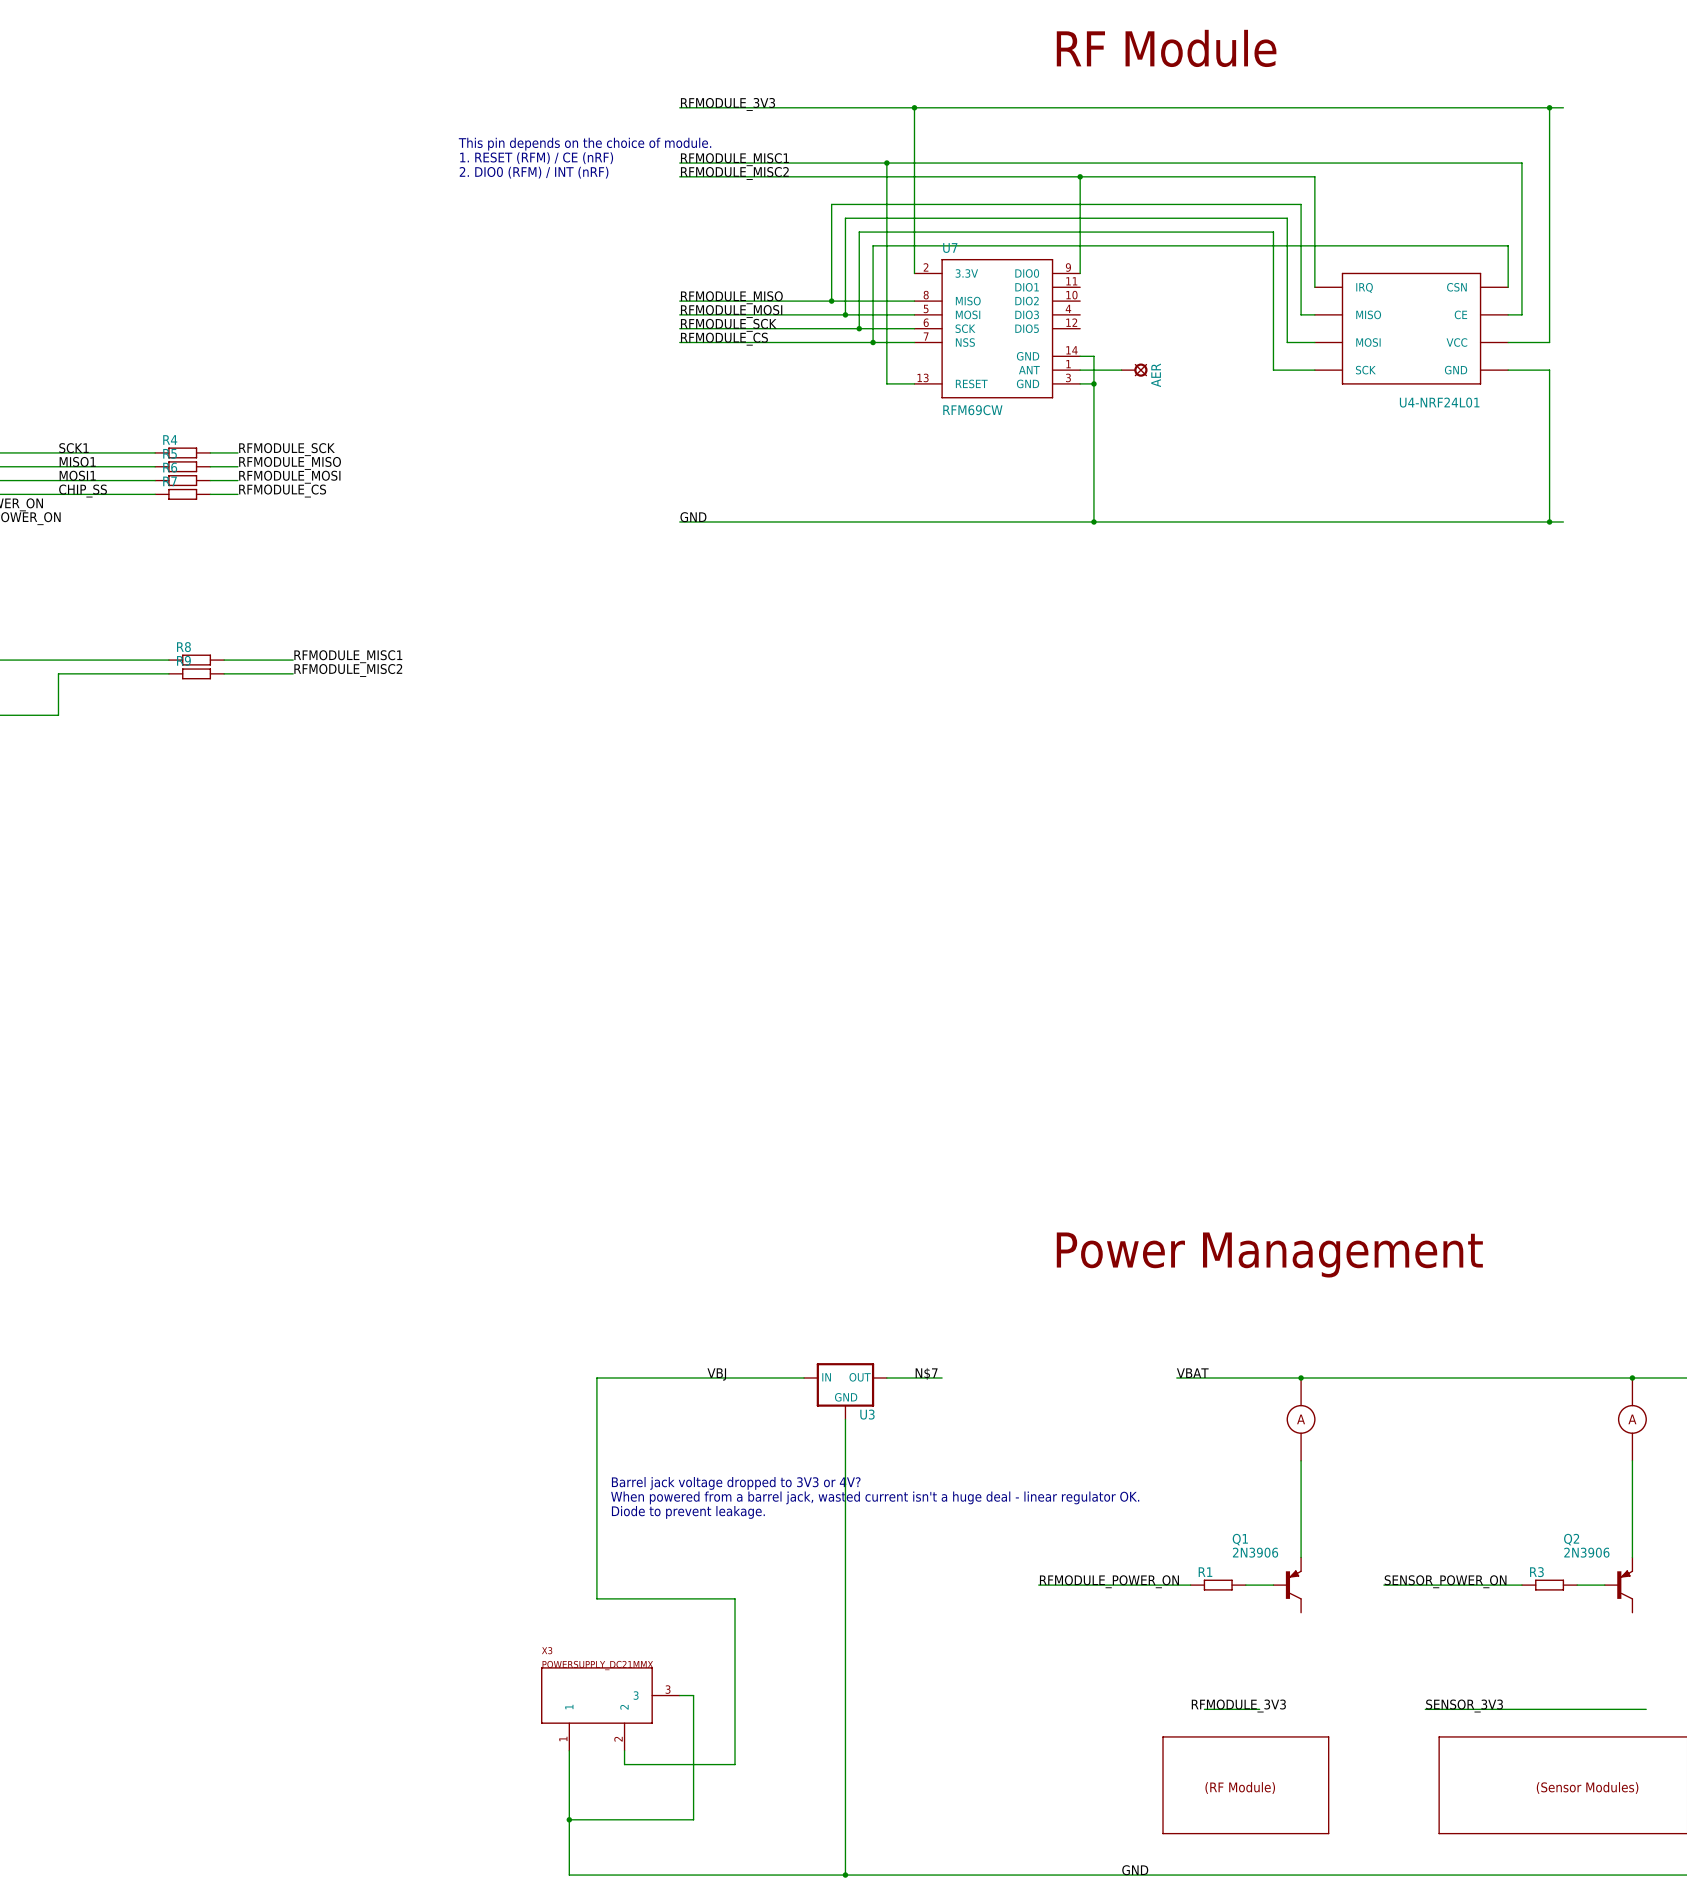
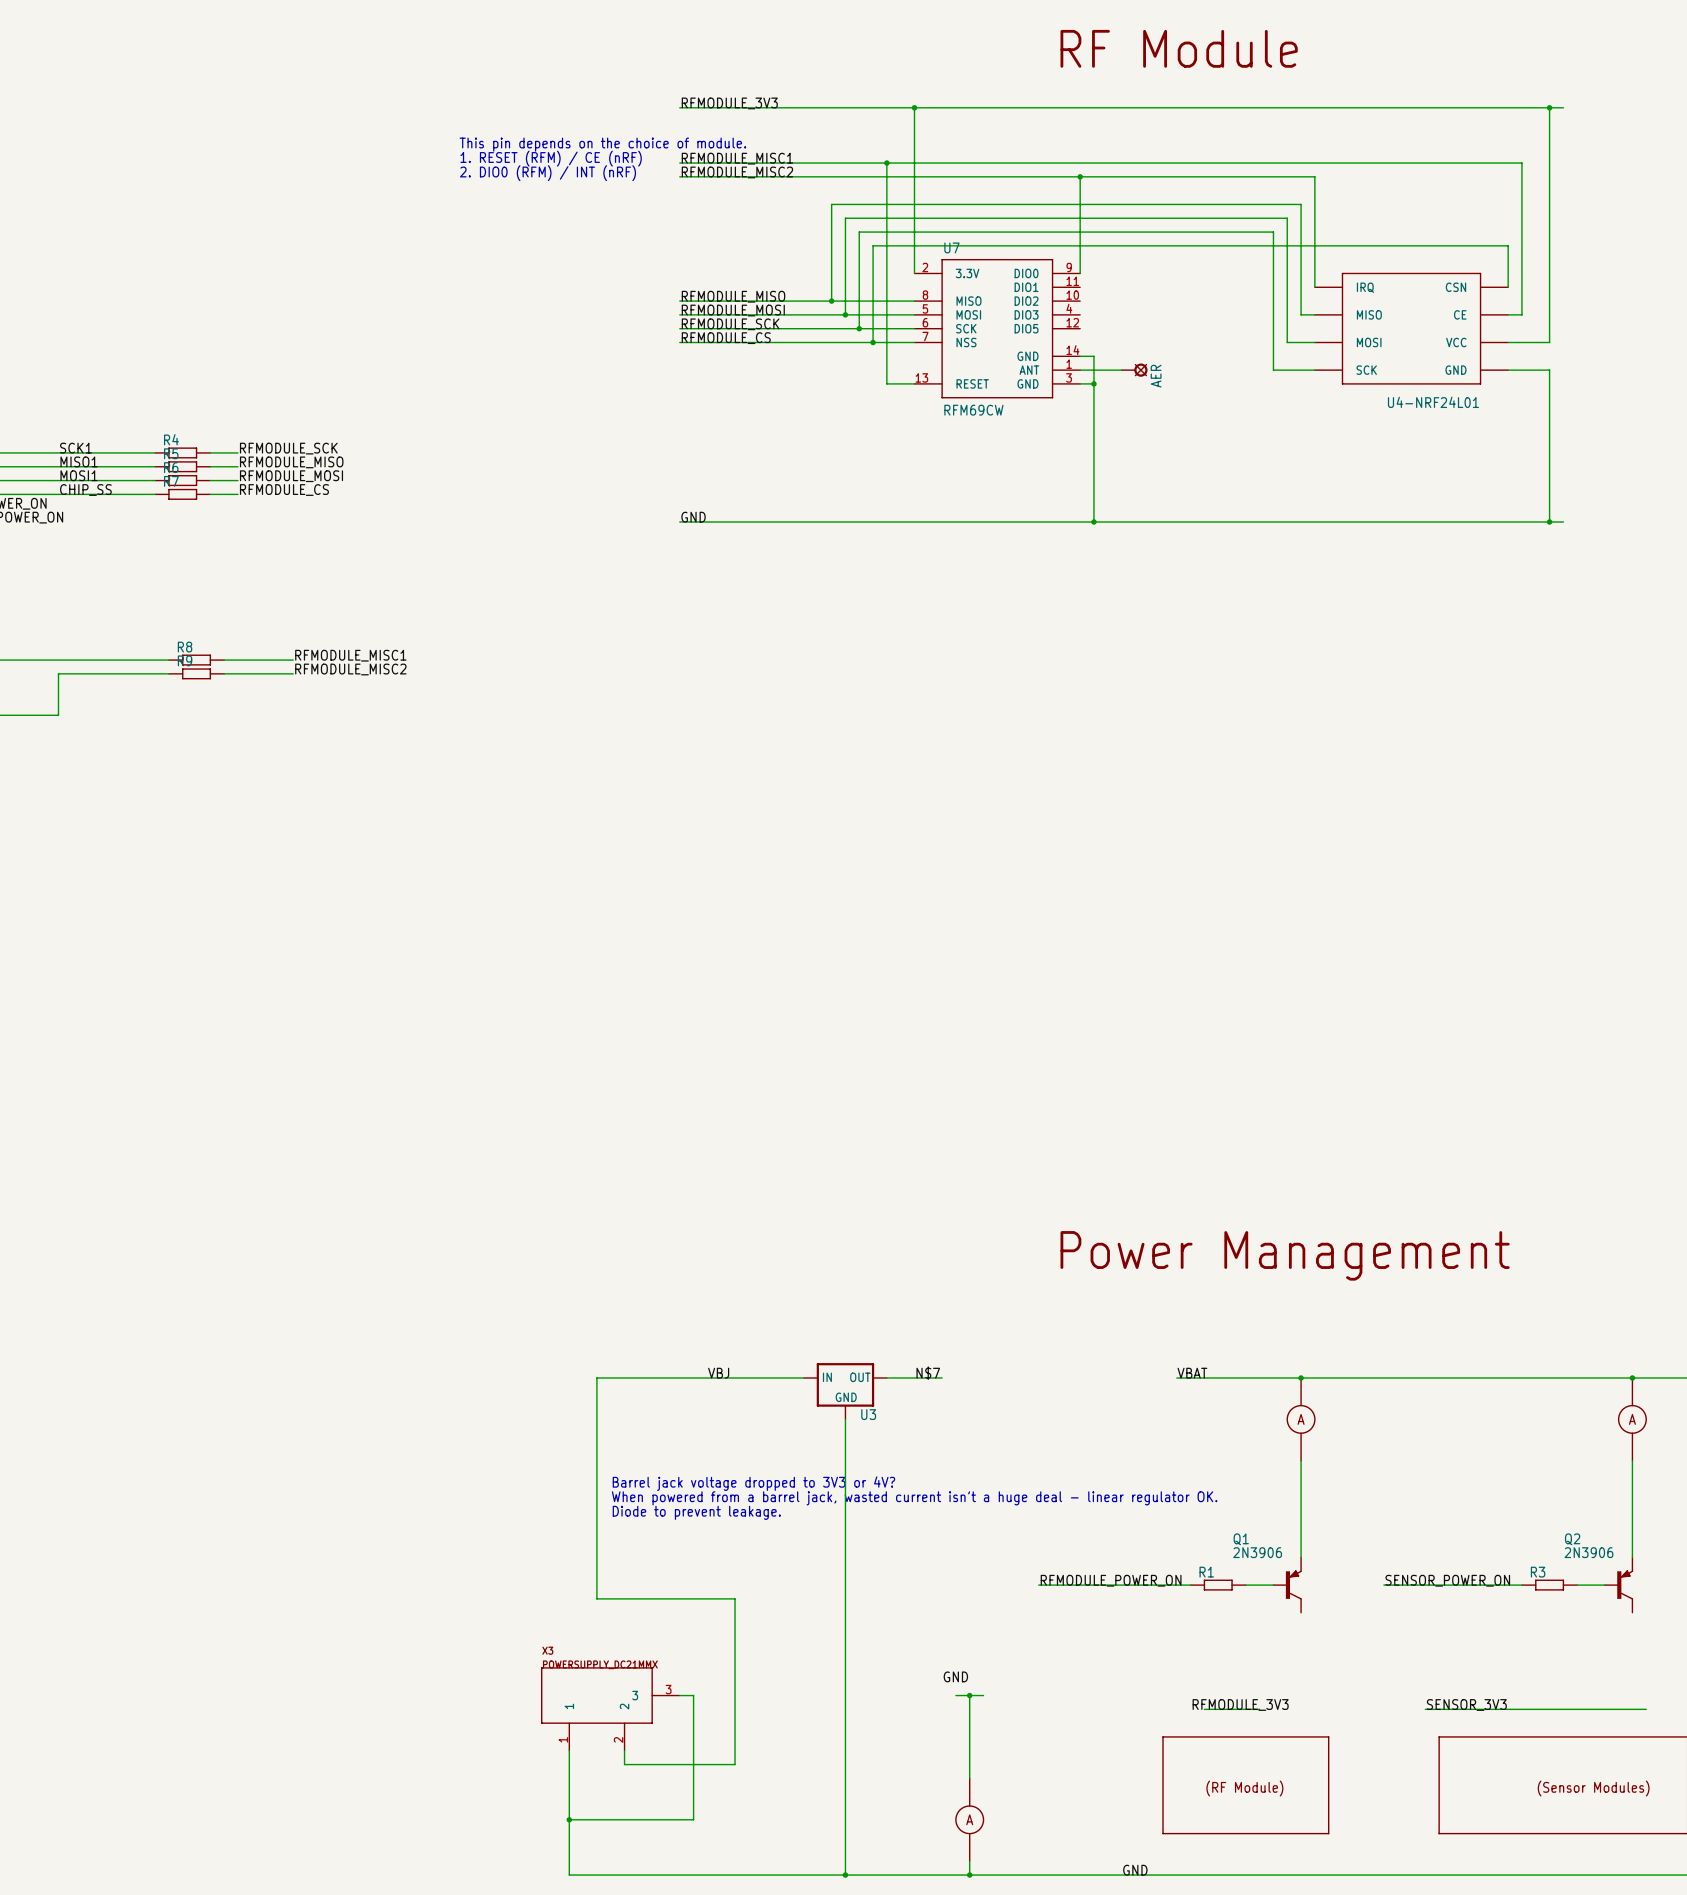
label: none -> GND (955, 1676)
wire: none -> (955, 1695) (983, 1695)
wire: none -> (969, 1695) (969, 1778)
junction: none -> (969, 1695)
part: none -> (969, 1819)
wire: none -> (969, 1861) (969, 1875)
junction: none -> (969, 1875)

